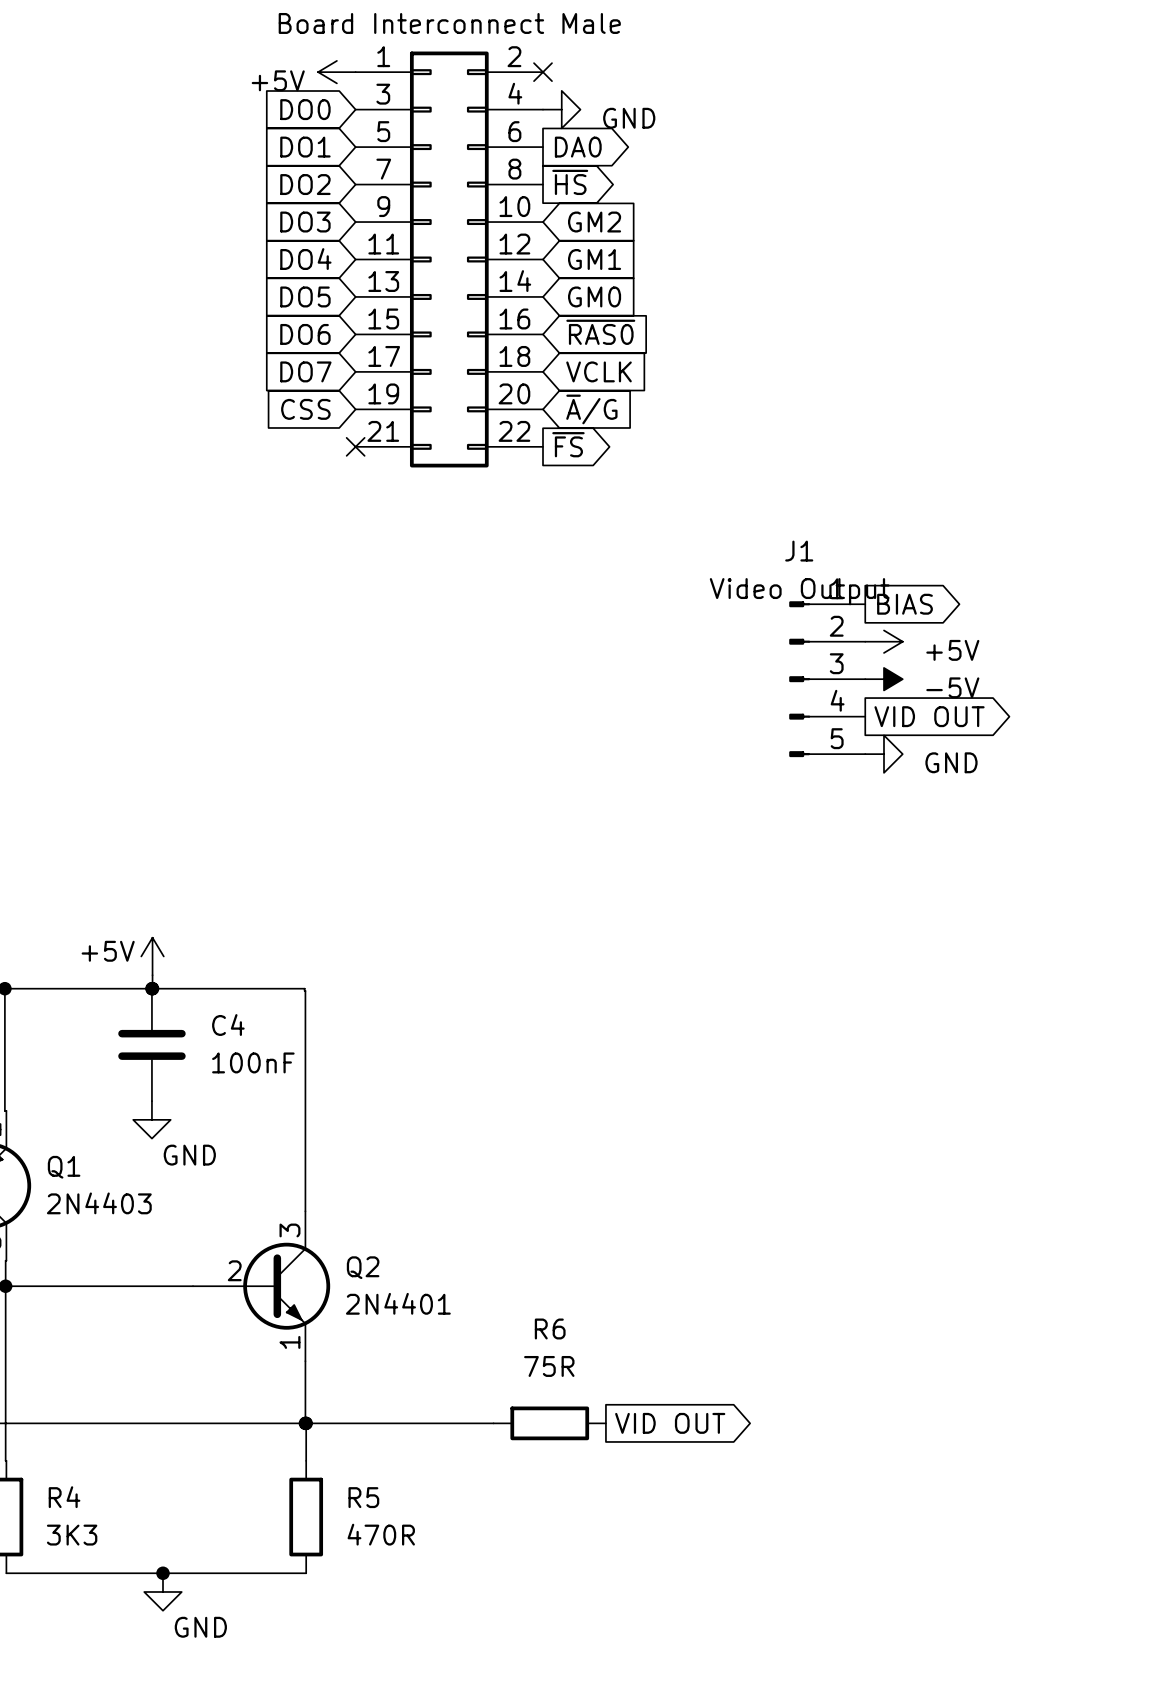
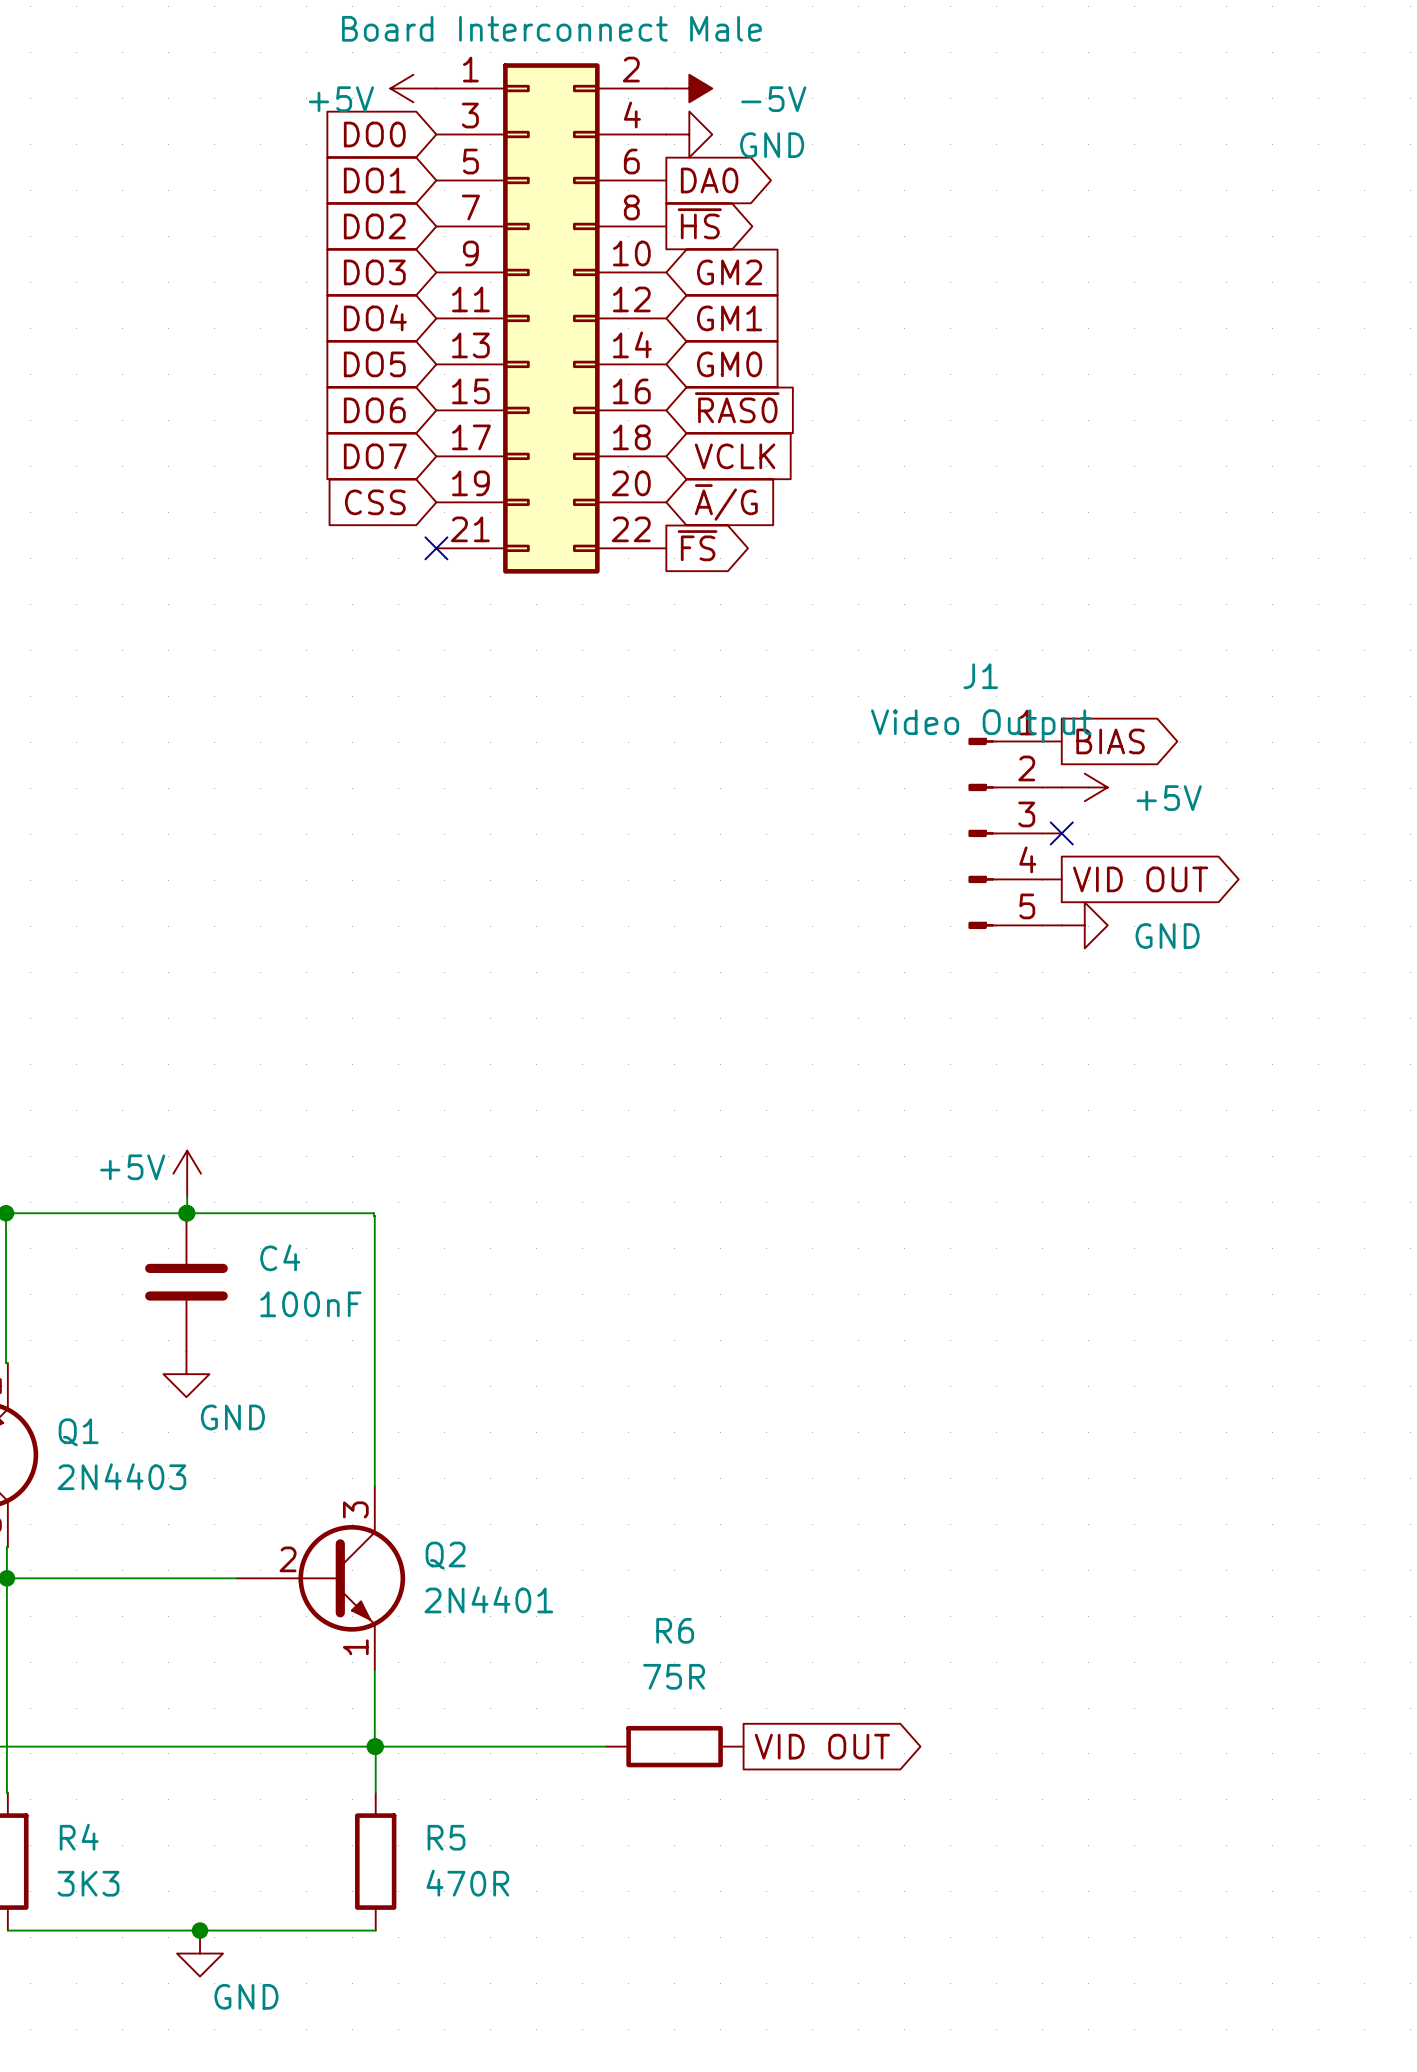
no-connect mark: (543, 72) -> none
power symbol: none -> -5V (689, 88)
no-connect mark: none -> (1061, 833)
power symbol: -5V (883, 679) -> none

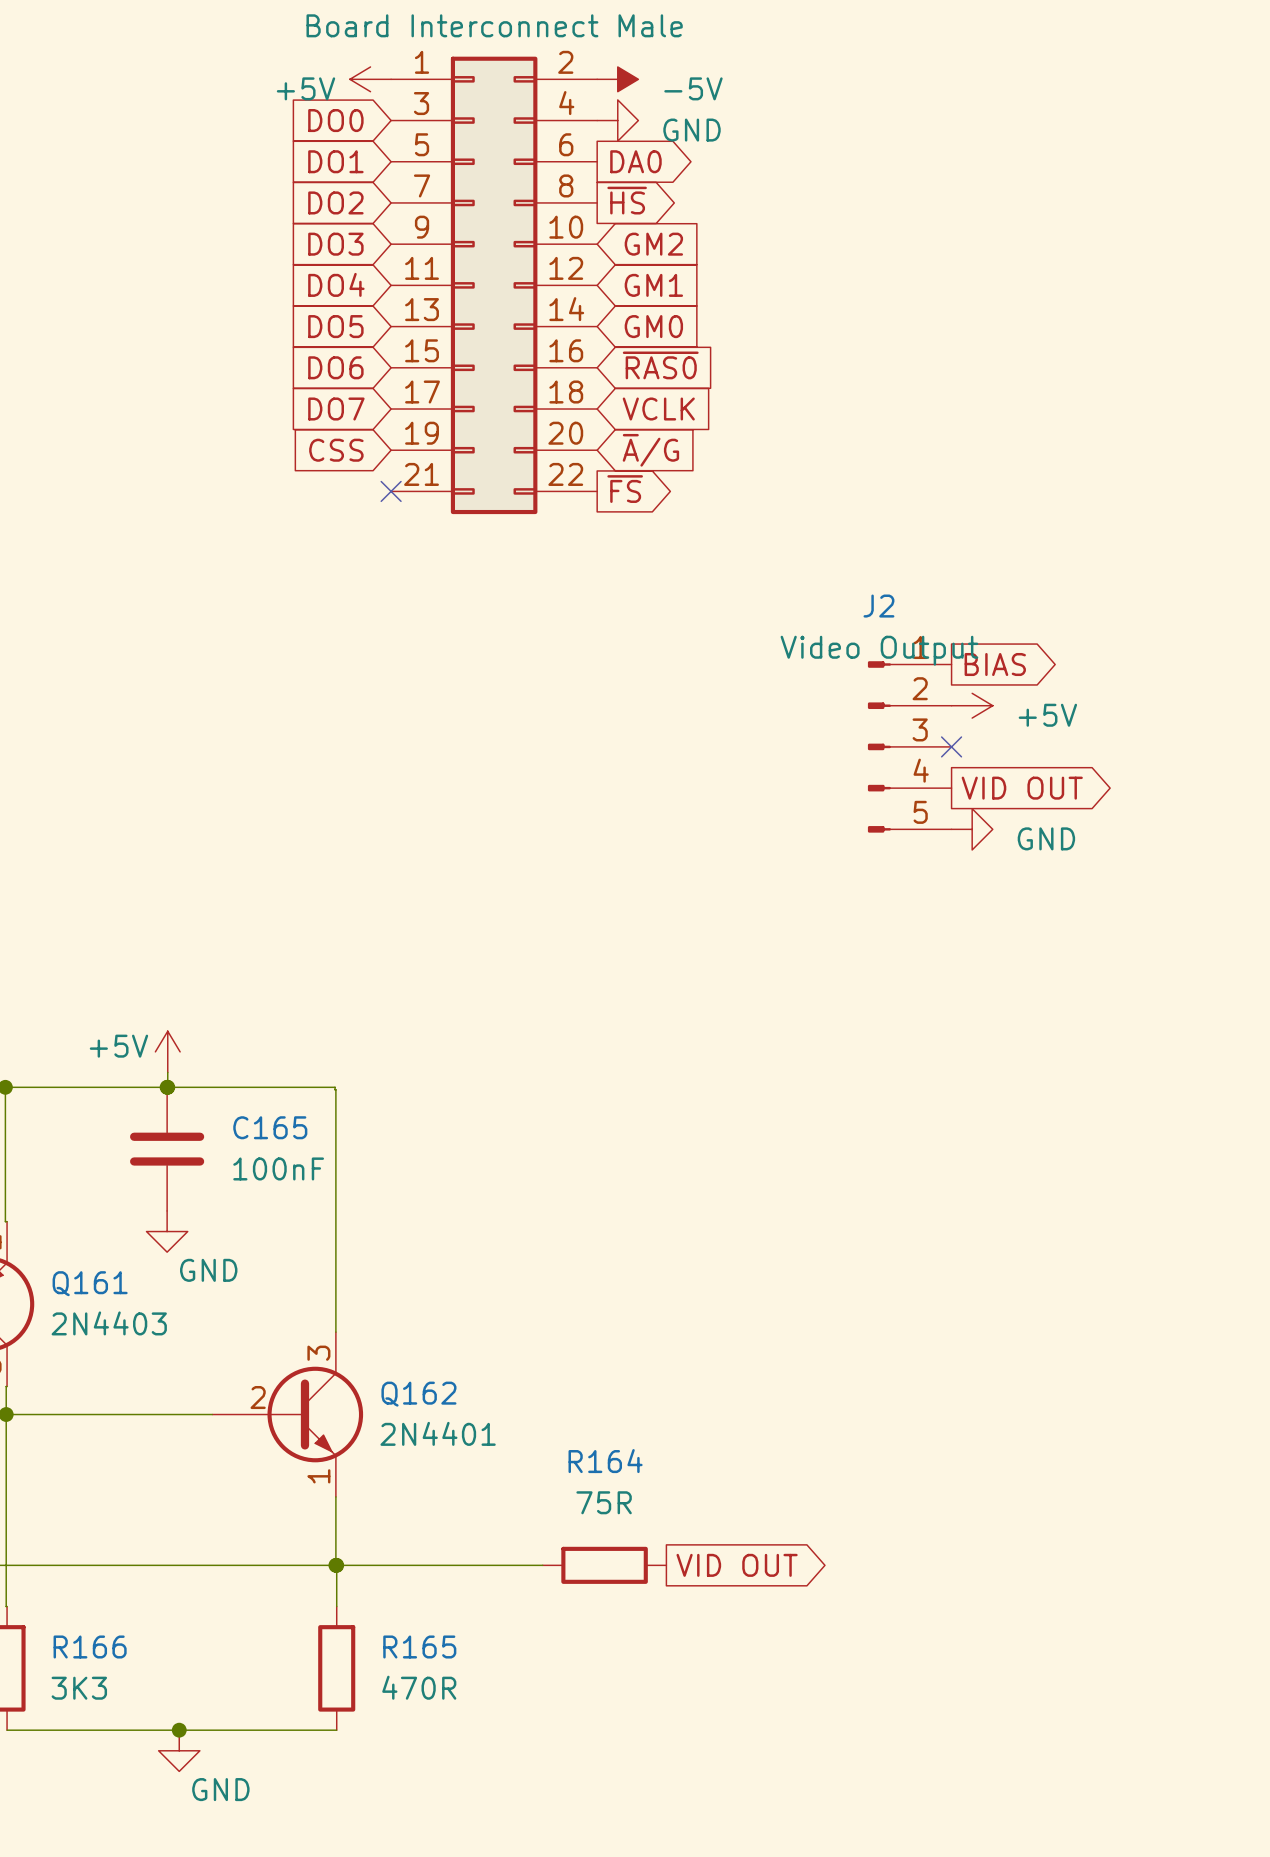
J1 name: J1 (980, 676) -> J2 (878, 606)
C4 name: C4 (280, 1257) -> C165 (270, 1127)
Q1 name: Q1 (78, 1432) -> Q161 (90, 1283)
Q2 name: Q2 (445, 1555) -> Q162 (418, 1394)
R6 name: R6 (675, 1630) -> R164 (605, 1461)
R4 name: R4 (79, 1837) -> R166 (90, 1646)
R5 name: R5 (446, 1837) -> R165 (419, 1646)

